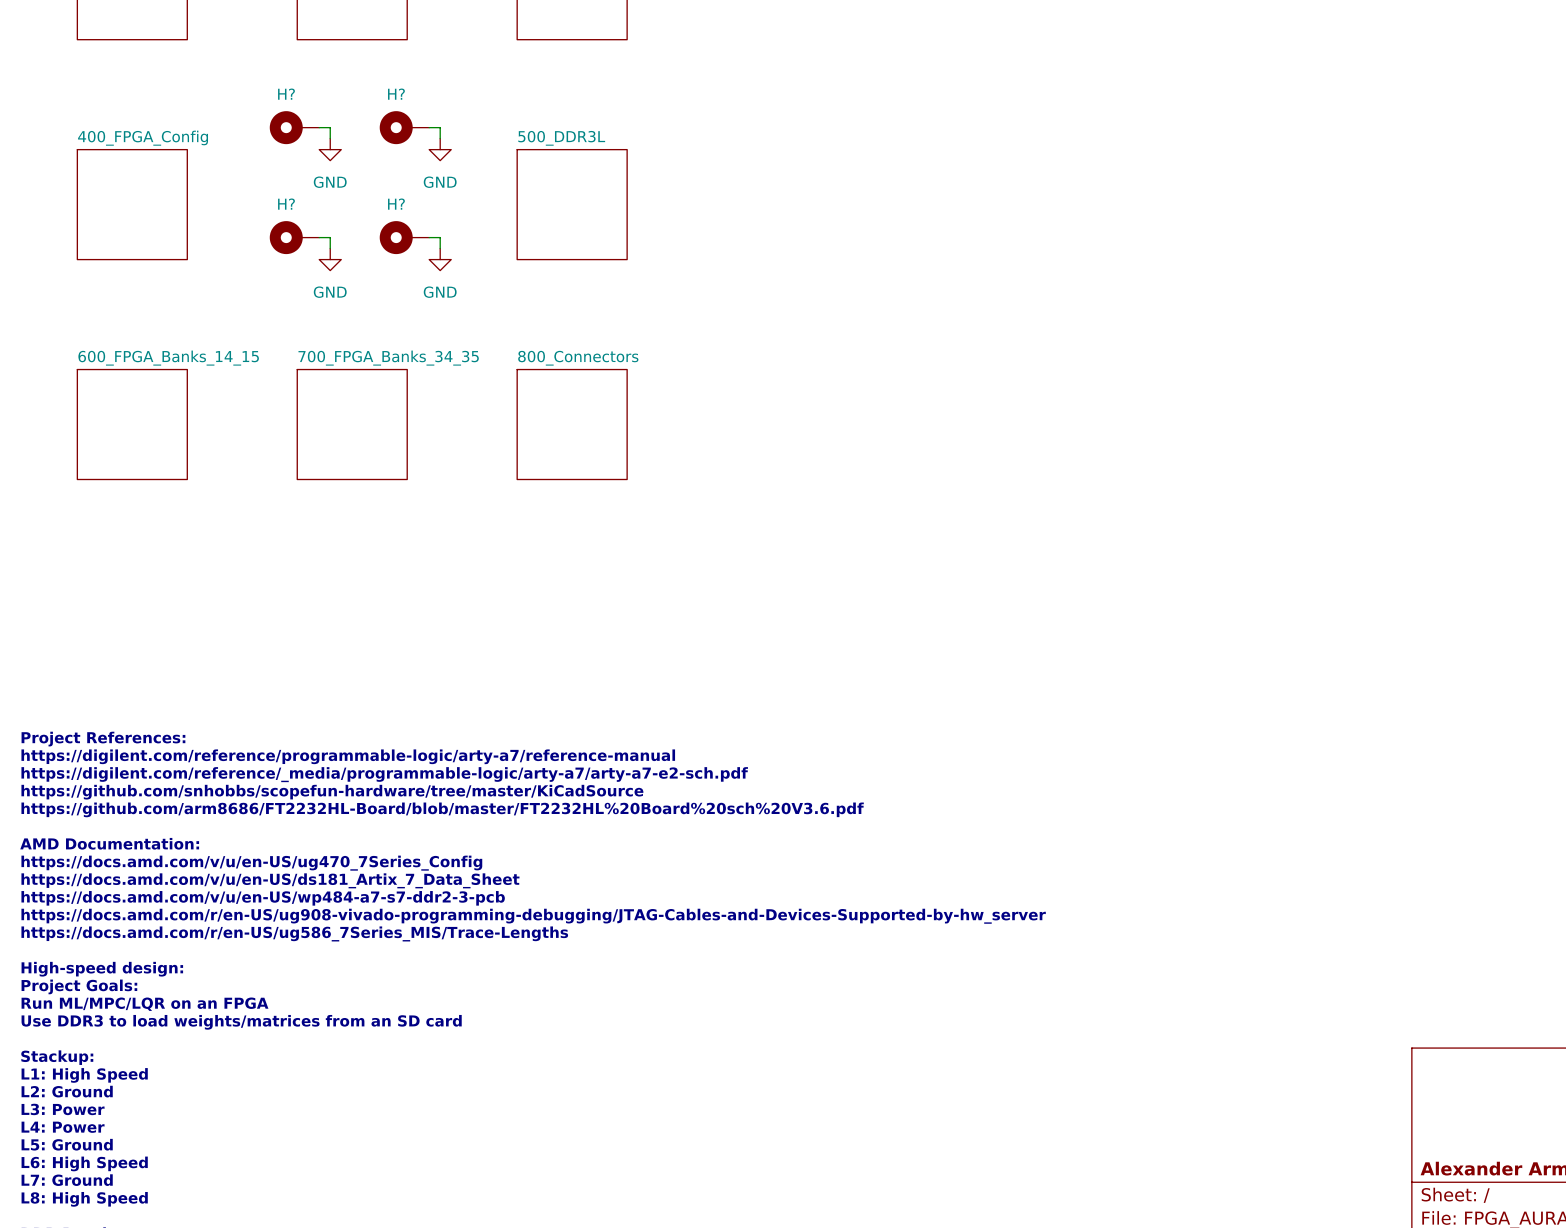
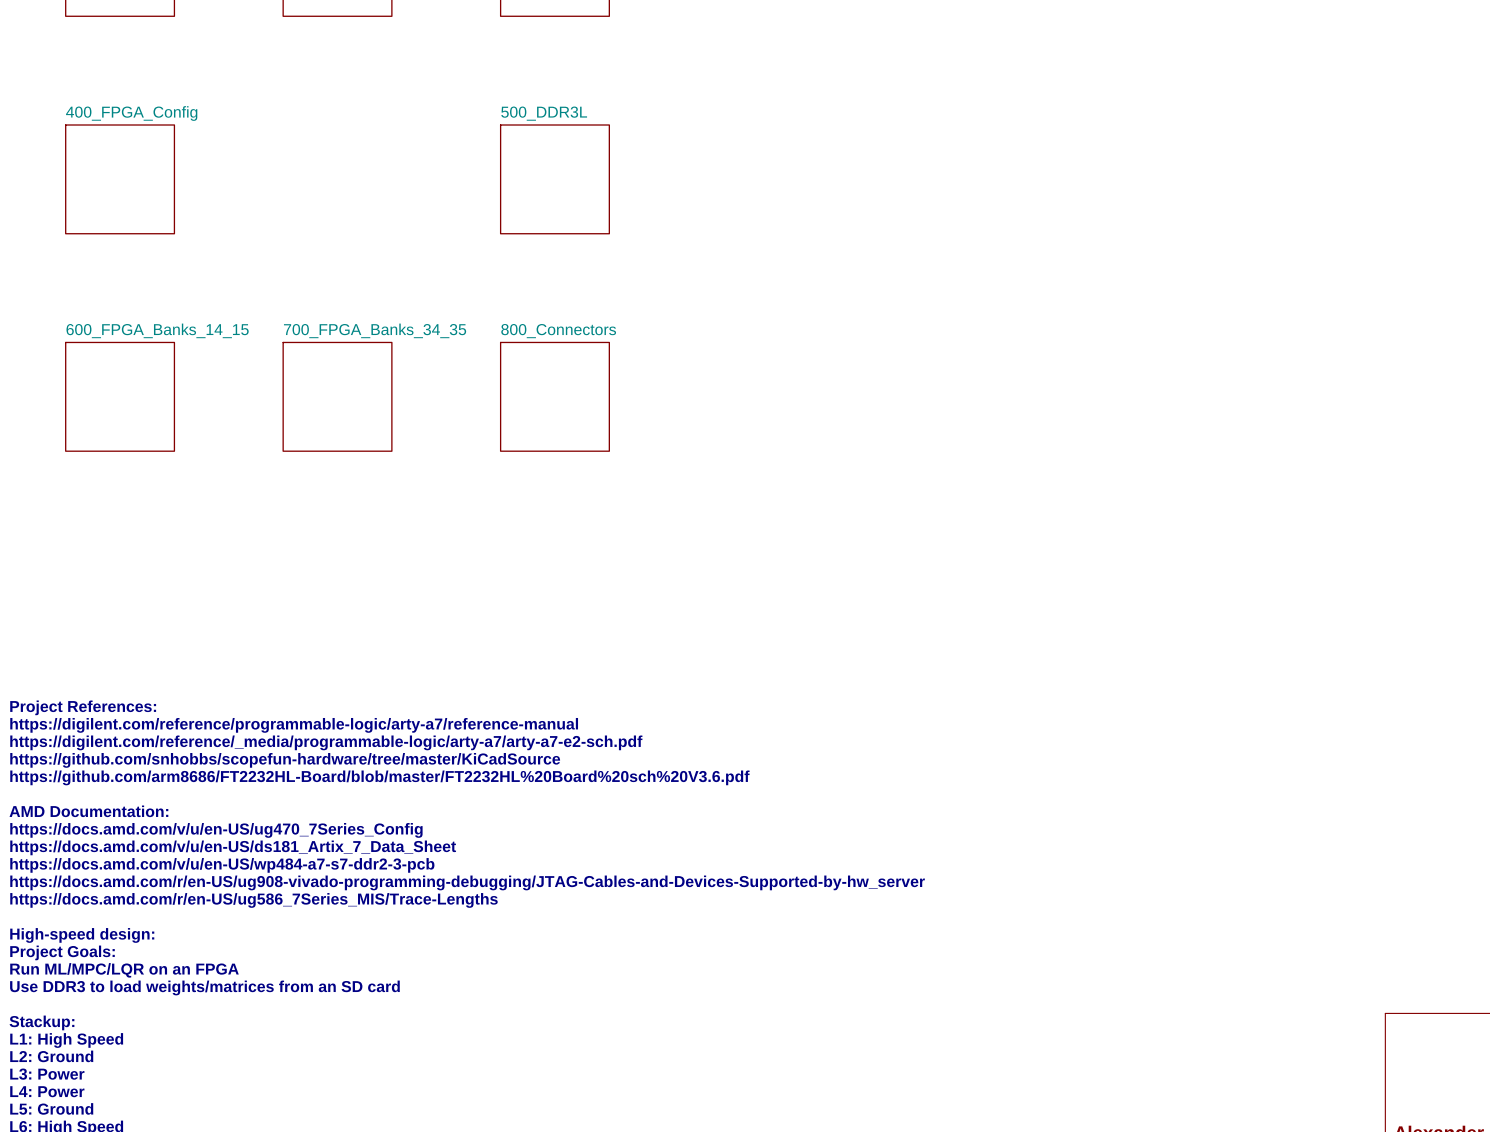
H?: (294, 127) -> none
wire: (319, 127) (330, 127) (330, 138) -> none
H?: (404, 127) -> none
wire: (429, 127) (440, 127) (440, 138) -> none
power symbol: GND (330, 149) -> none
power symbol: GND (440, 149) -> none
H?: (294, 237) -> none
wire: (319, 237) (330, 237) (330, 248) -> none
H?: (404, 237) -> none
wire: (429, 237) (440, 237) (440, 248) -> none
power symbol: GND (330, 259) -> none
power symbol: GND (440, 259) -> none

